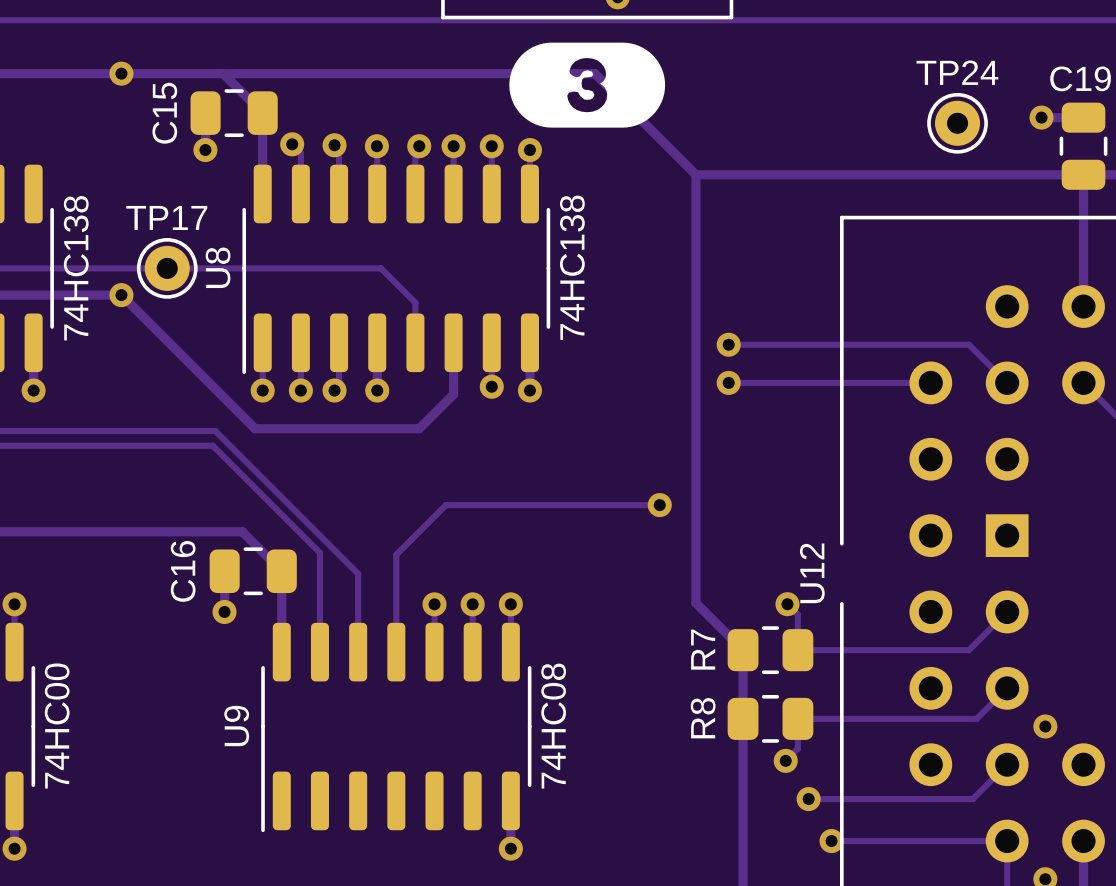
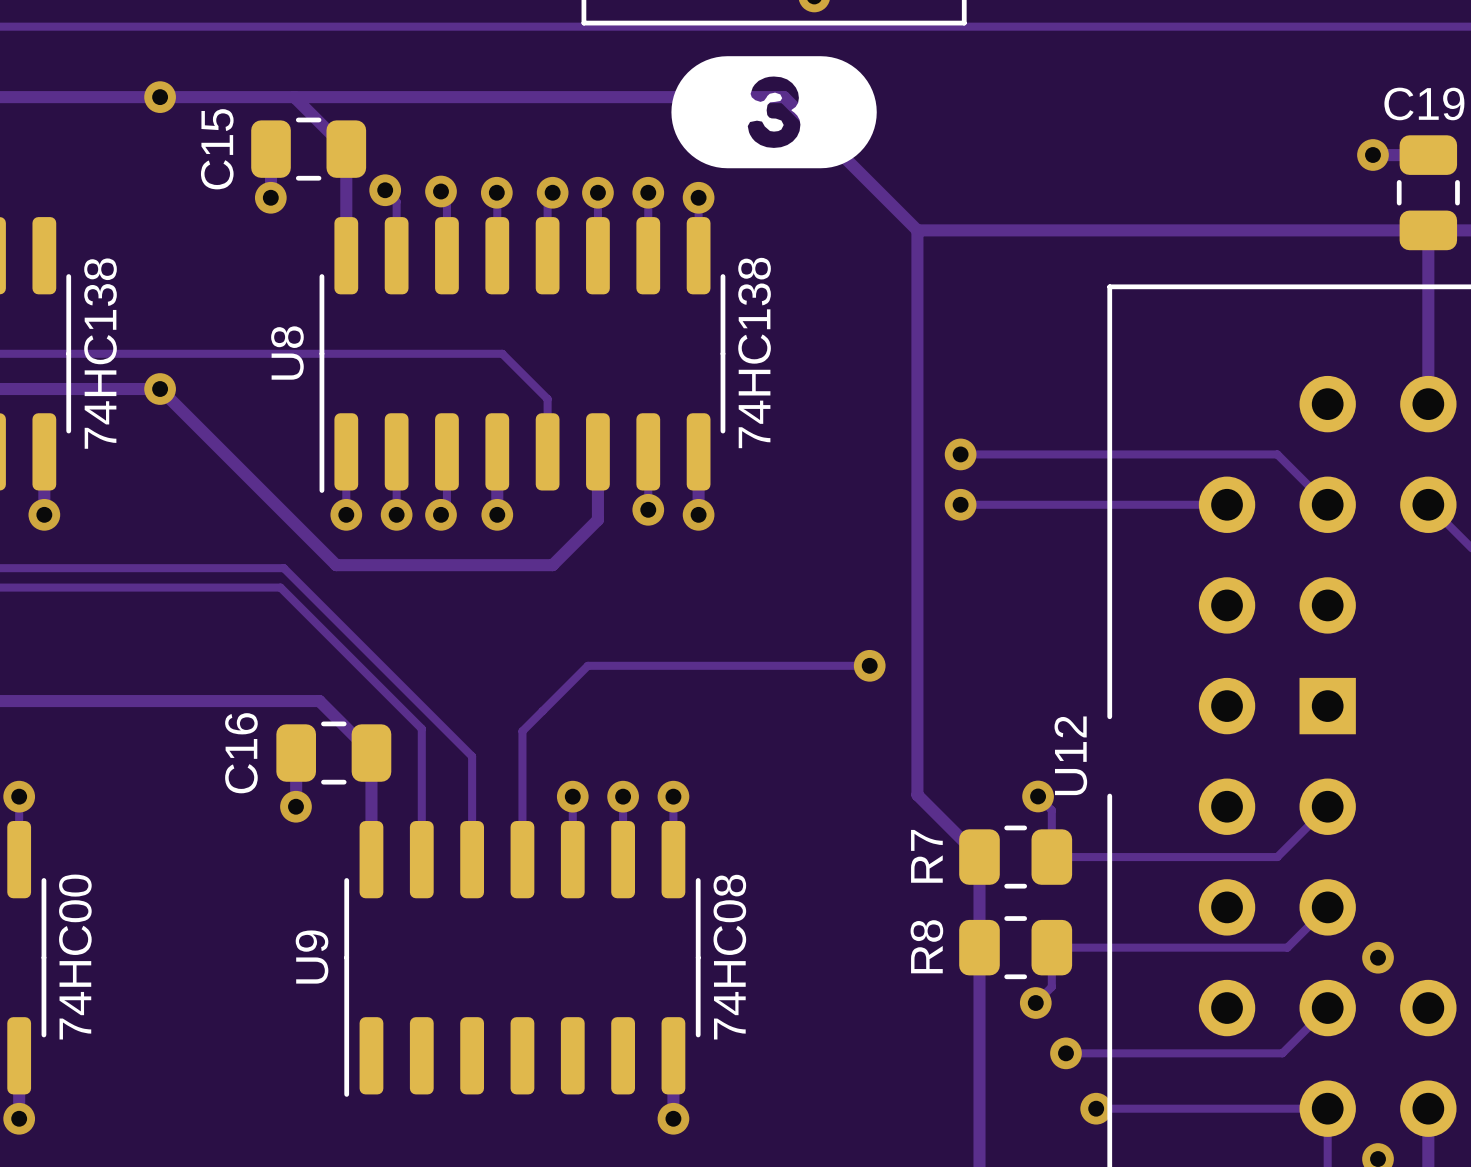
TP24: (957, 123) -> none
TP17: (167, 268) -> none

